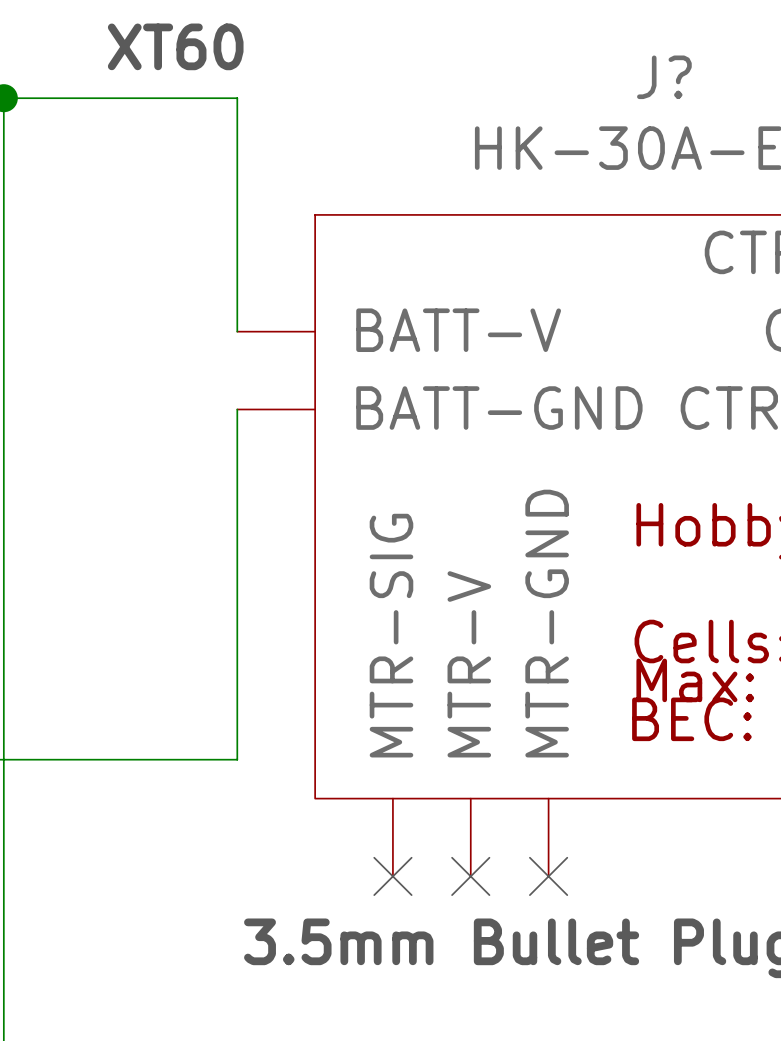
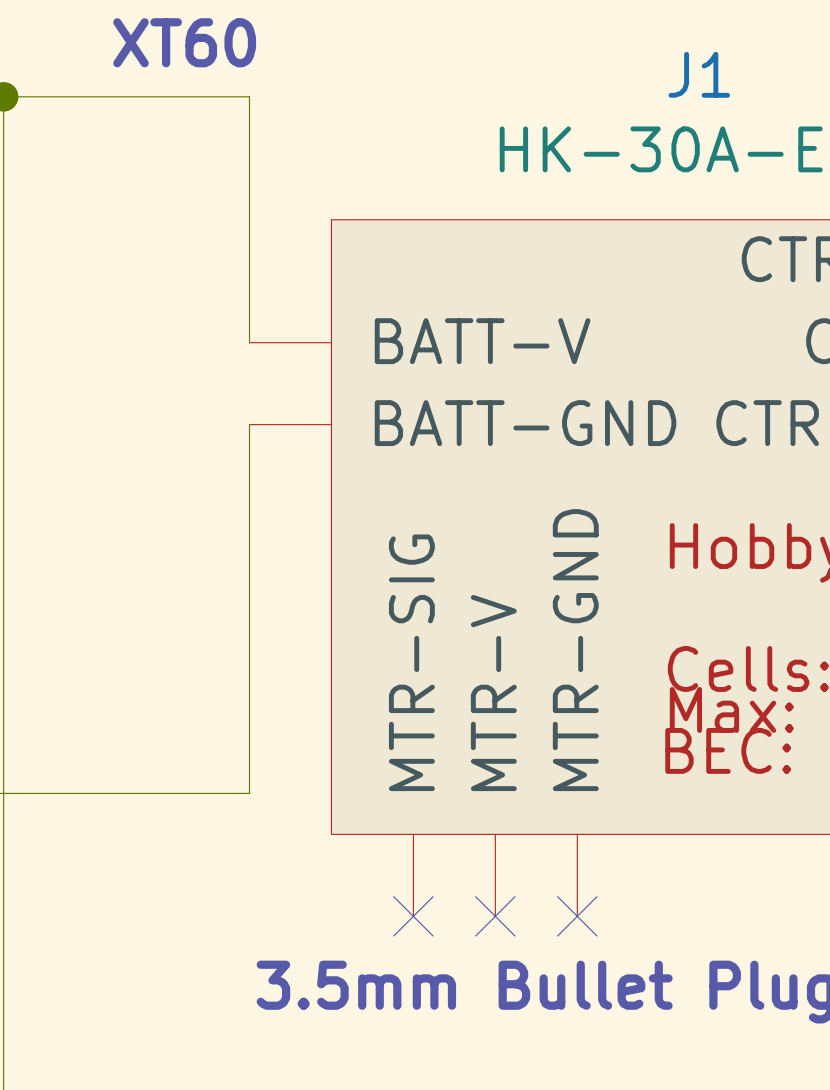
J? name: J? (664, 77) -> J1 (699, 74)

